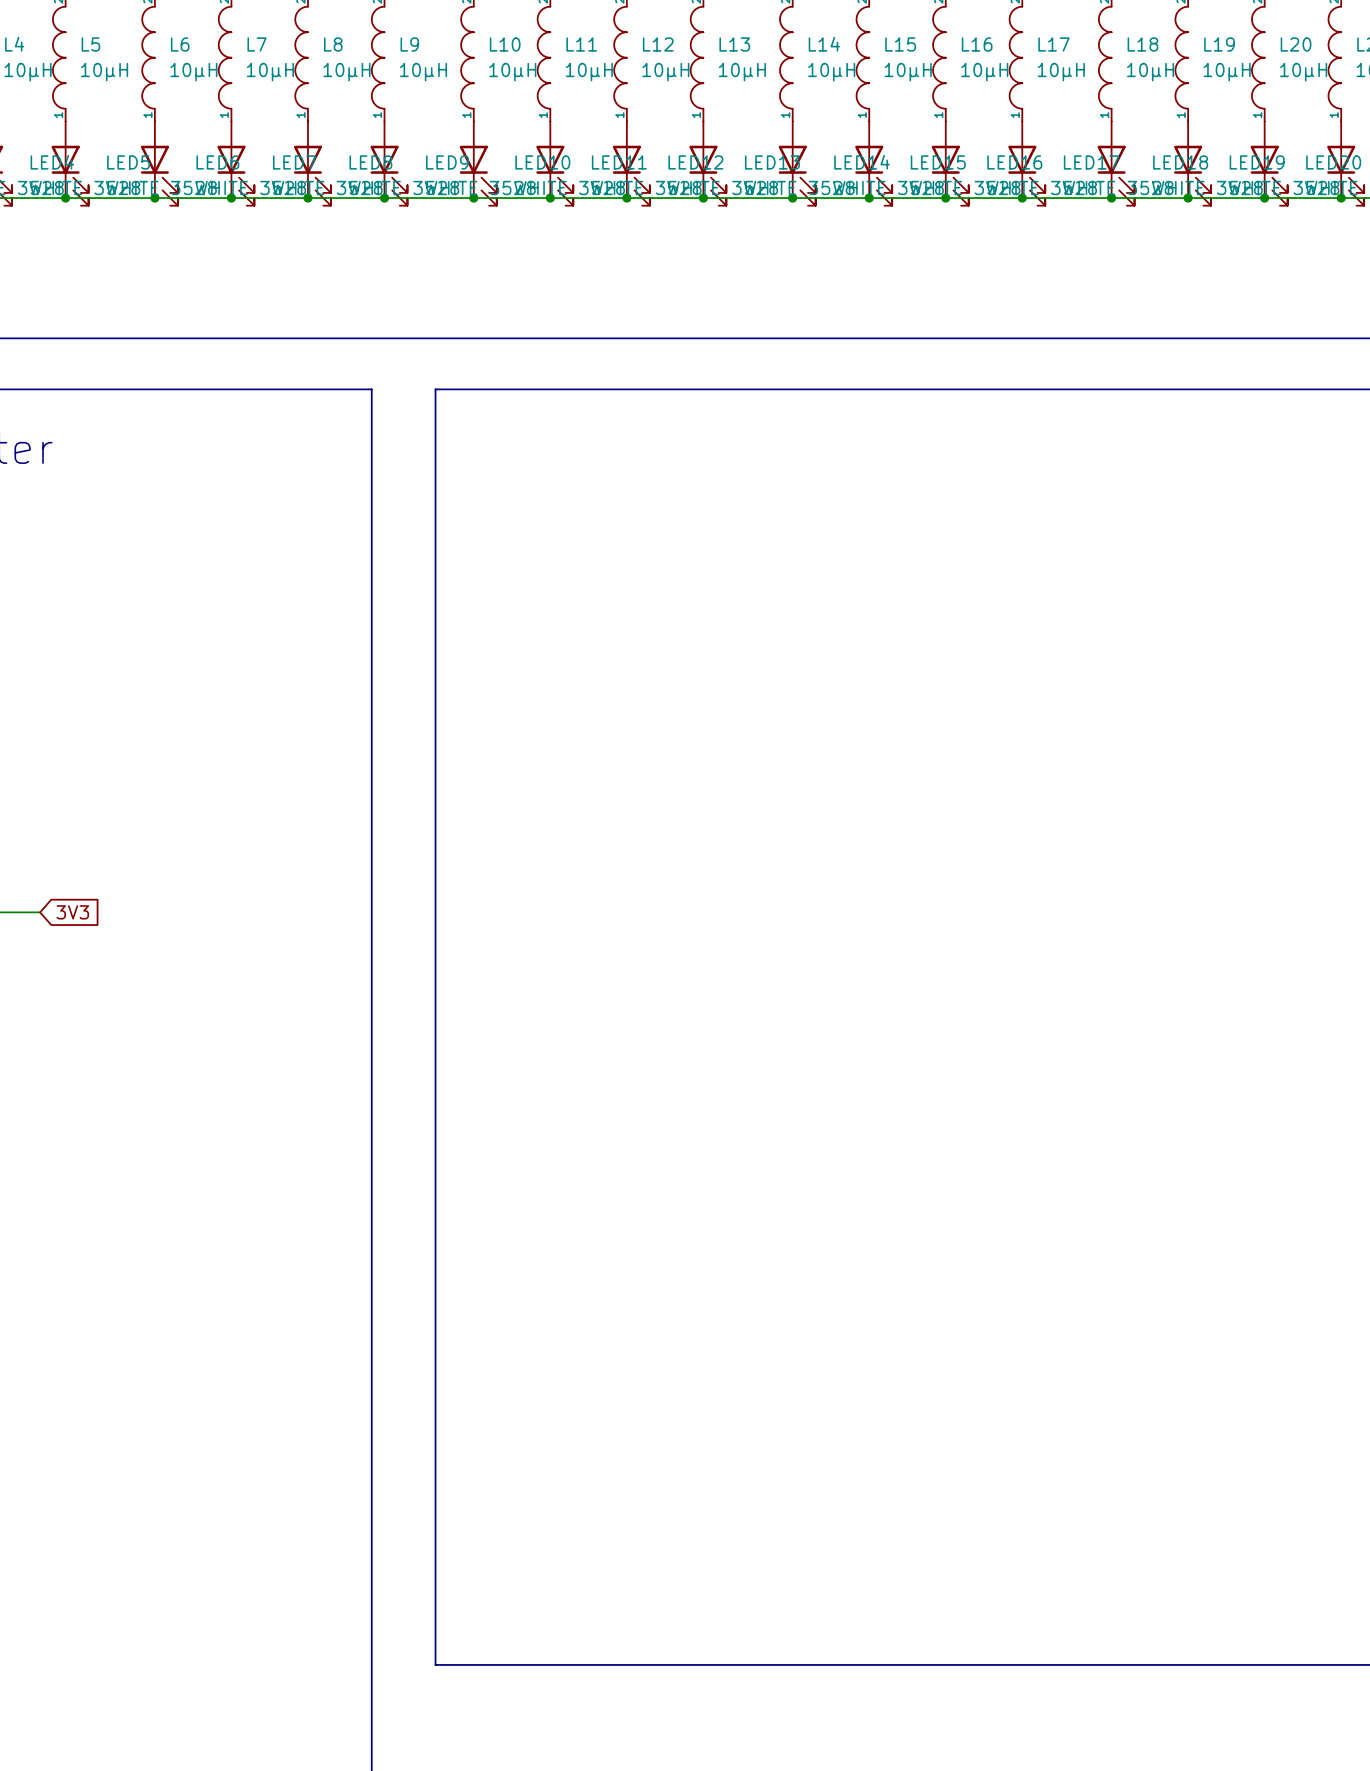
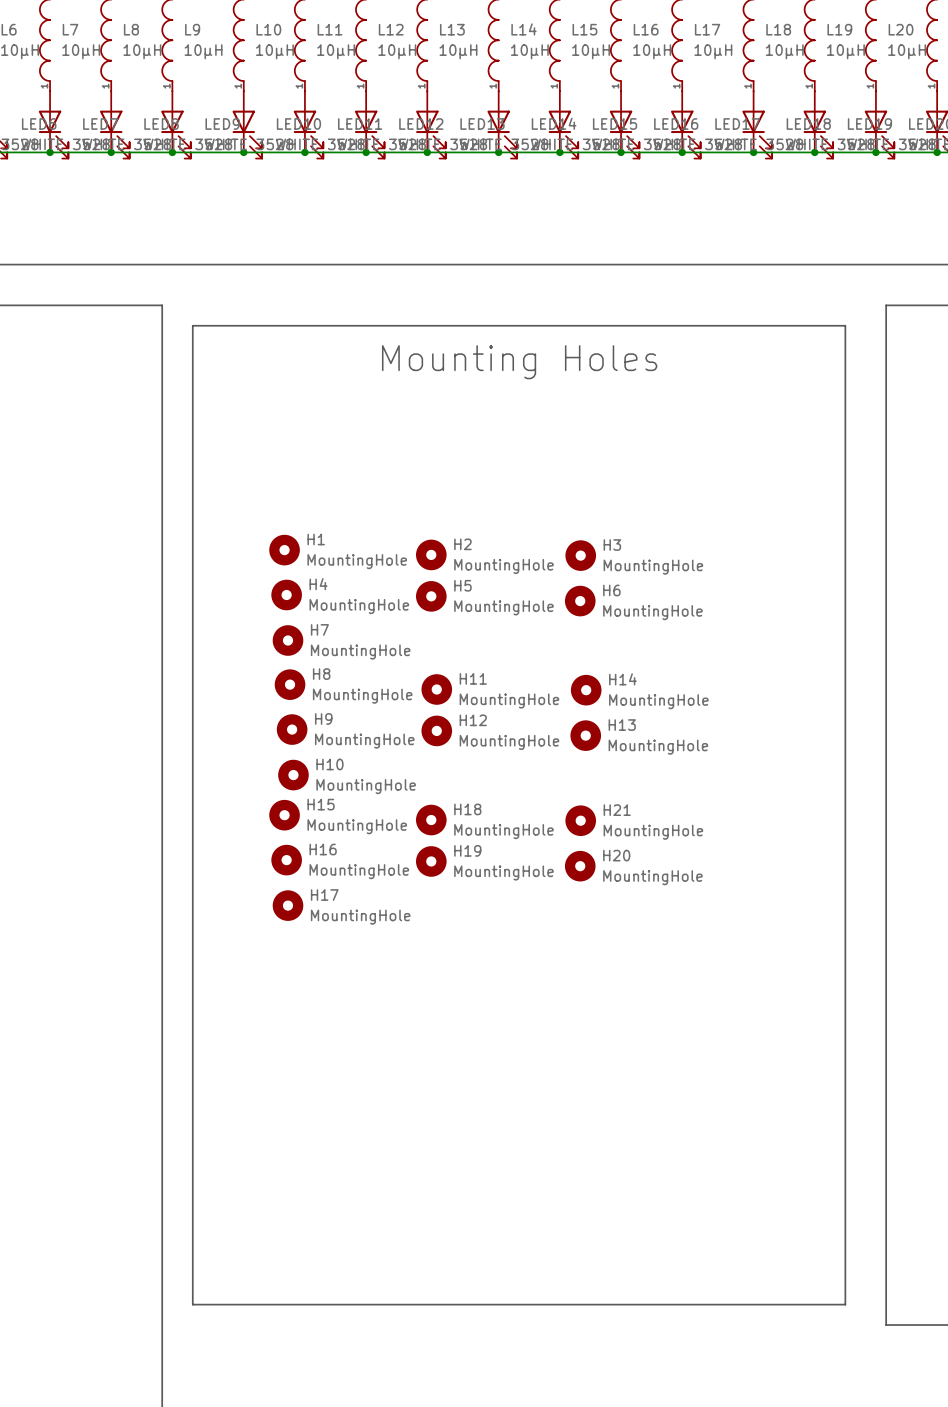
line: (1277, 389) (435, 389) (435, 1664) (1277, 1664) -> (886, 305) (886, 1325)
line: none -> (192, 325) (845, 325) (845, 1304) (192, 1304) (192, 325)
text: none -> Mounting Holes (519, 362)
H1: none -> MountingHole (284, 550)
H2: none -> MountingHole (431, 554)
H3: none -> MountingHole (580, 555)
H4: none -> MountingHole (286, 594)
H5: none -> MountingHole (431, 596)
H6: none -> MountingHole (580, 601)
H7: none -> MountingHole (287, 640)
H8: none -> MountingHole (290, 684)
H11: none -> MountingHole (436, 689)
H14: none -> MountingHole (586, 690)
H9: none -> MountingHole (292, 729)
H12: none -> MountingHole (436, 730)
H13: none -> MountingHole (585, 735)
H10: none -> MountingHole (293, 775)
H15: none -> MountingHole (284, 815)
H18: none -> MountingHole (431, 820)
H21: none -> MountingHole (580, 820)
H16: none -> MountingHole (286, 860)
H19: none -> MountingHole (431, 861)
H20: none -> MountingHole (580, 866)
H17: none -> MountingHole (287, 905)

